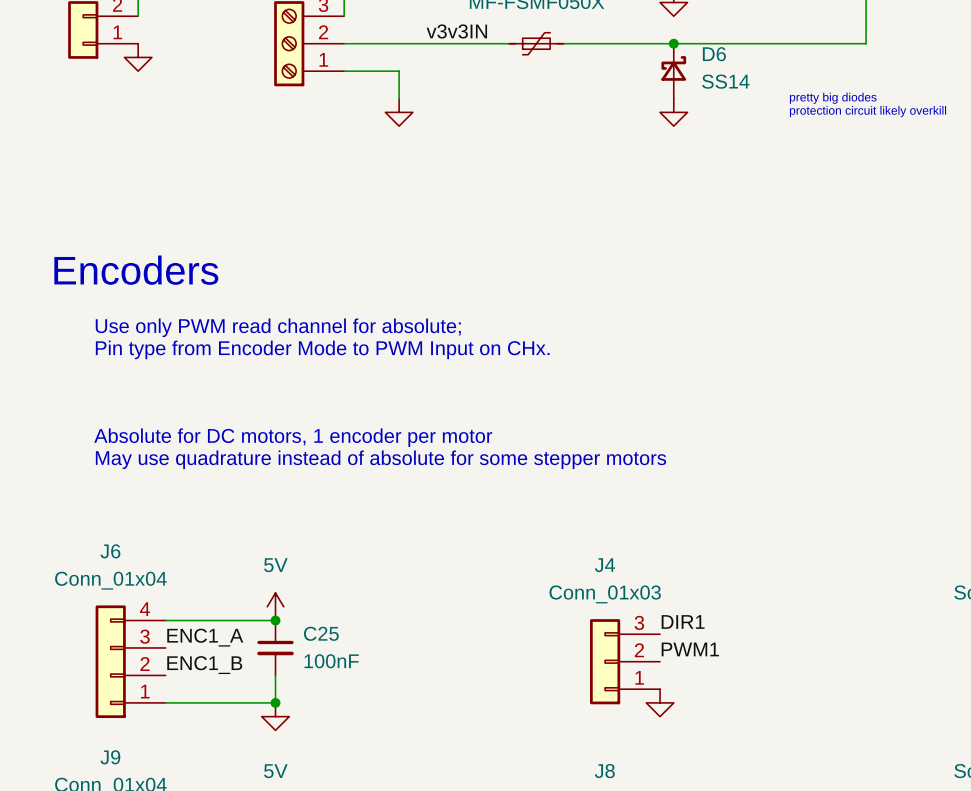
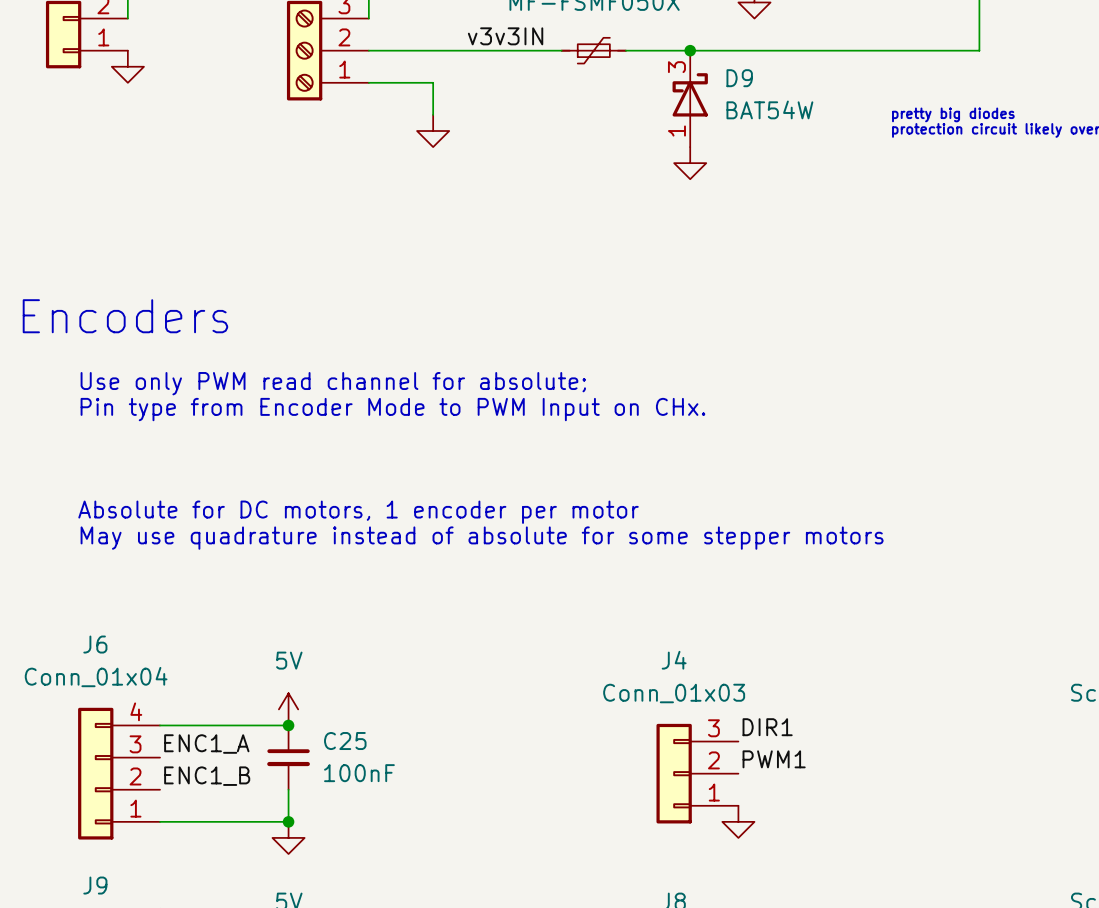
junction position: (673, 43) -> (690, 50)
D6: SS14 (673, 71) -> none
D9: none -> BAT54W (690, 98)
power symbol position: (673, 112) -> (690, 163)

